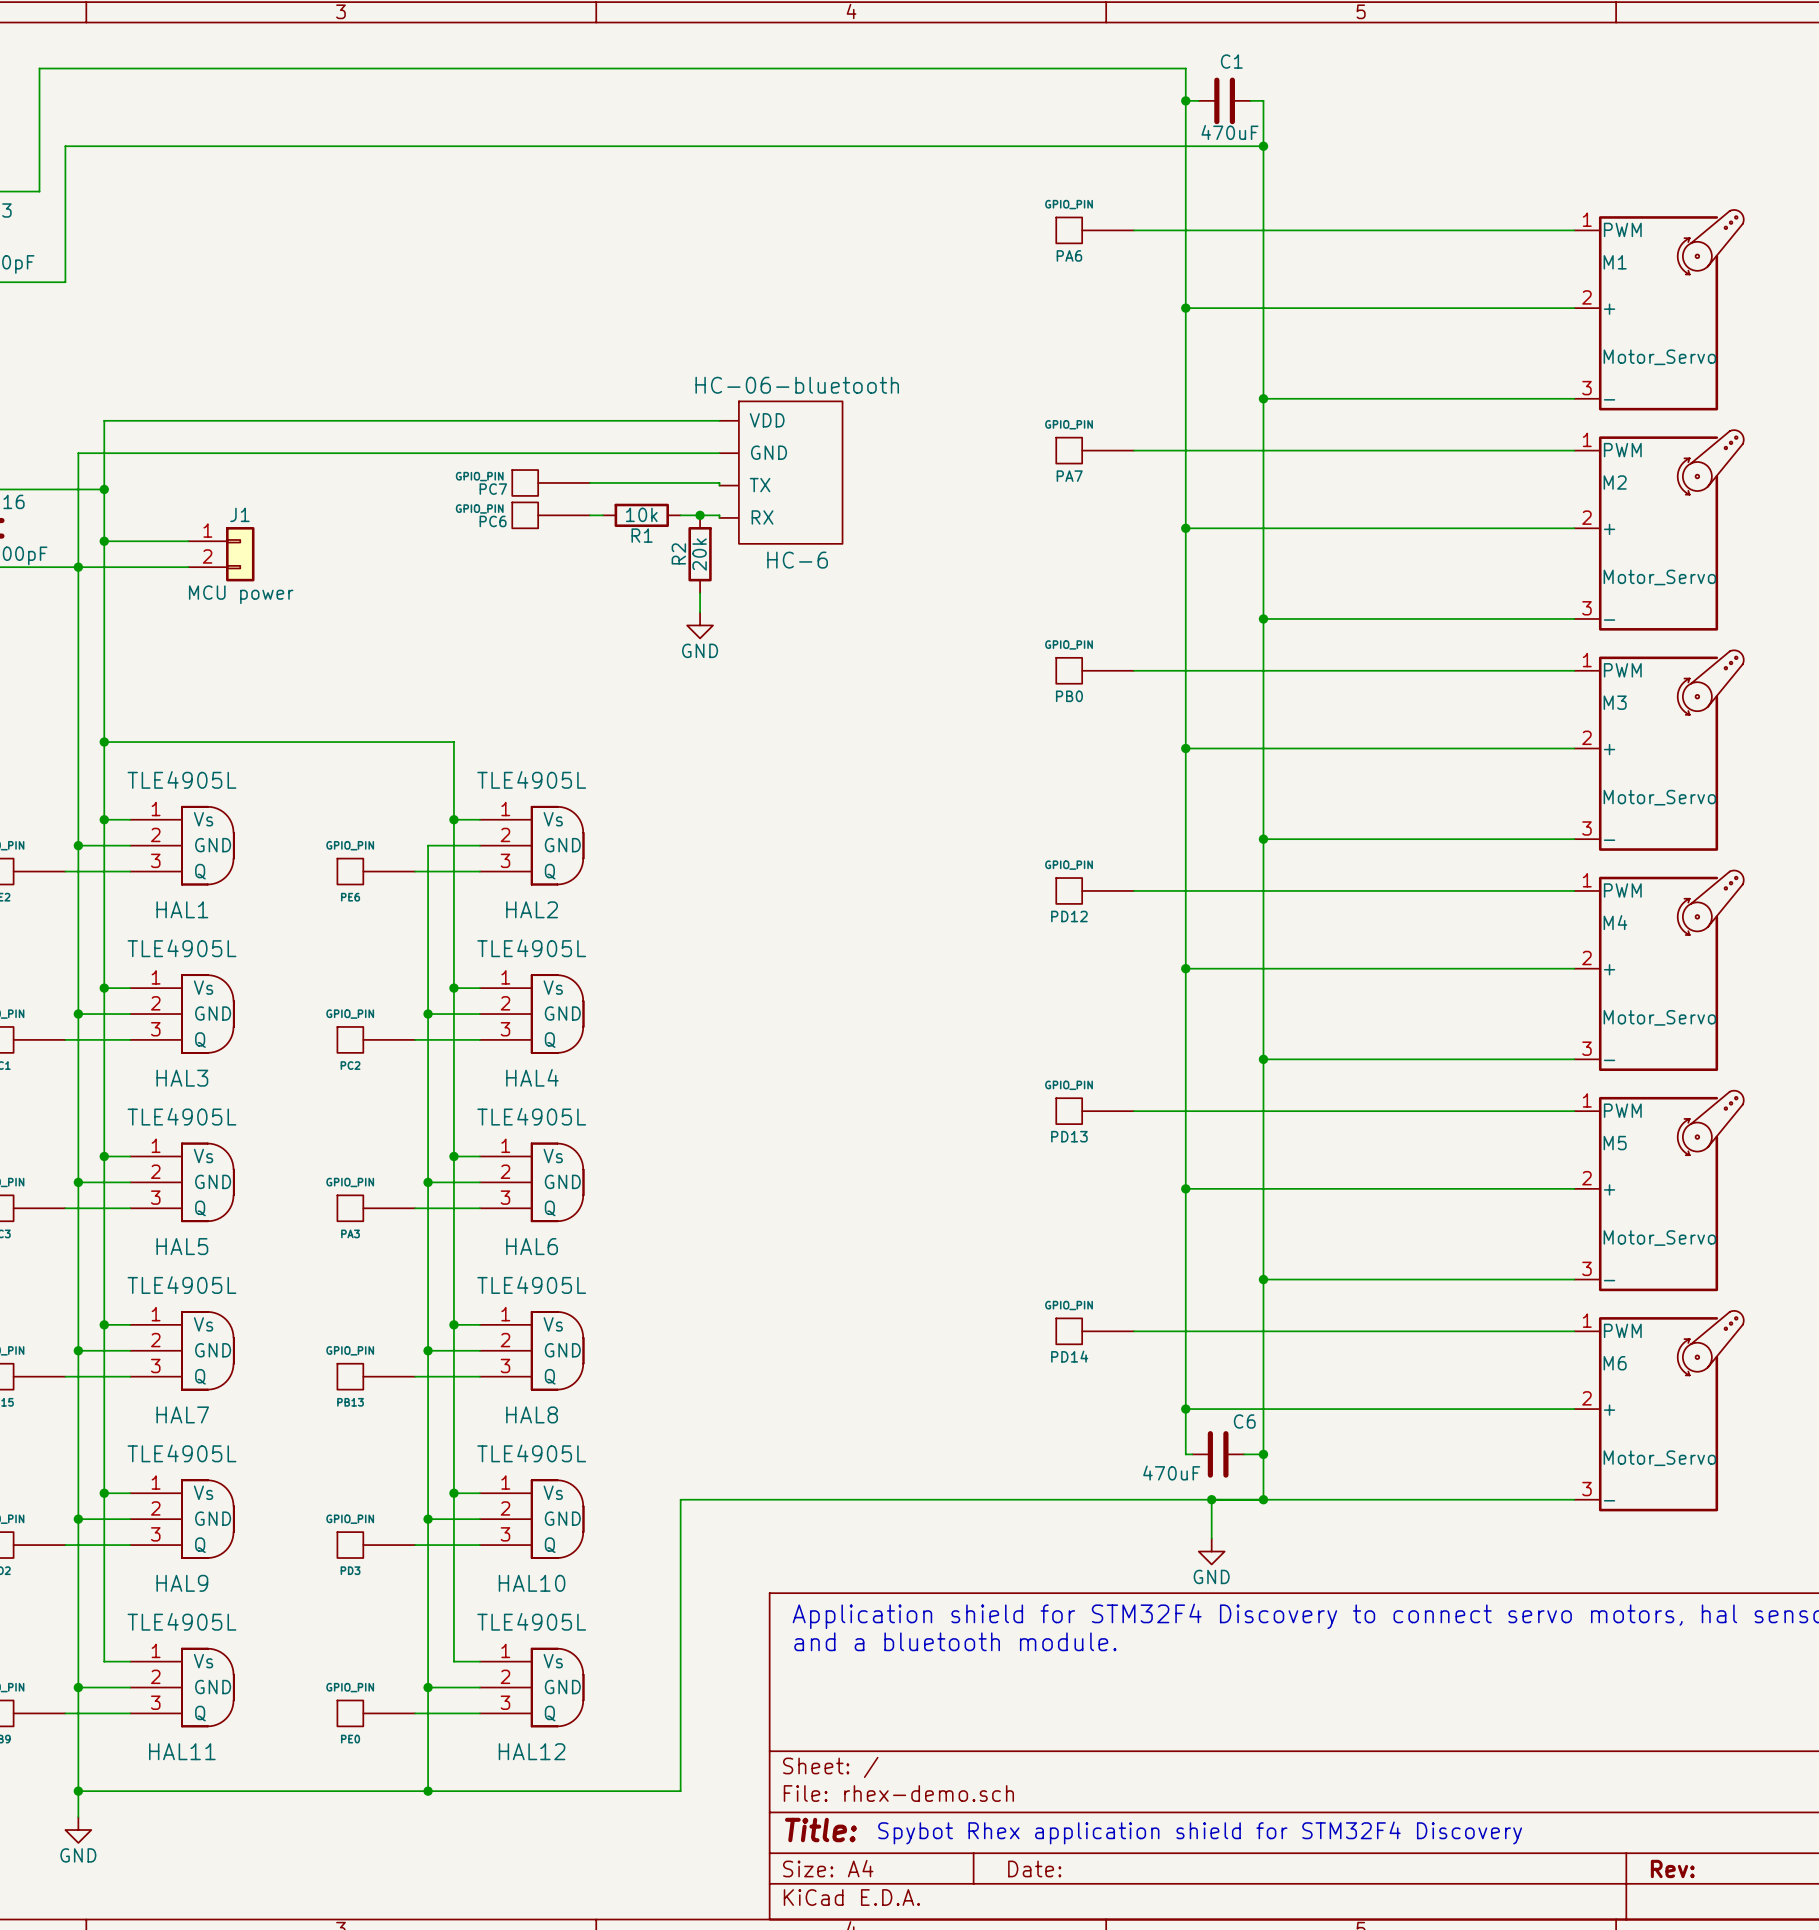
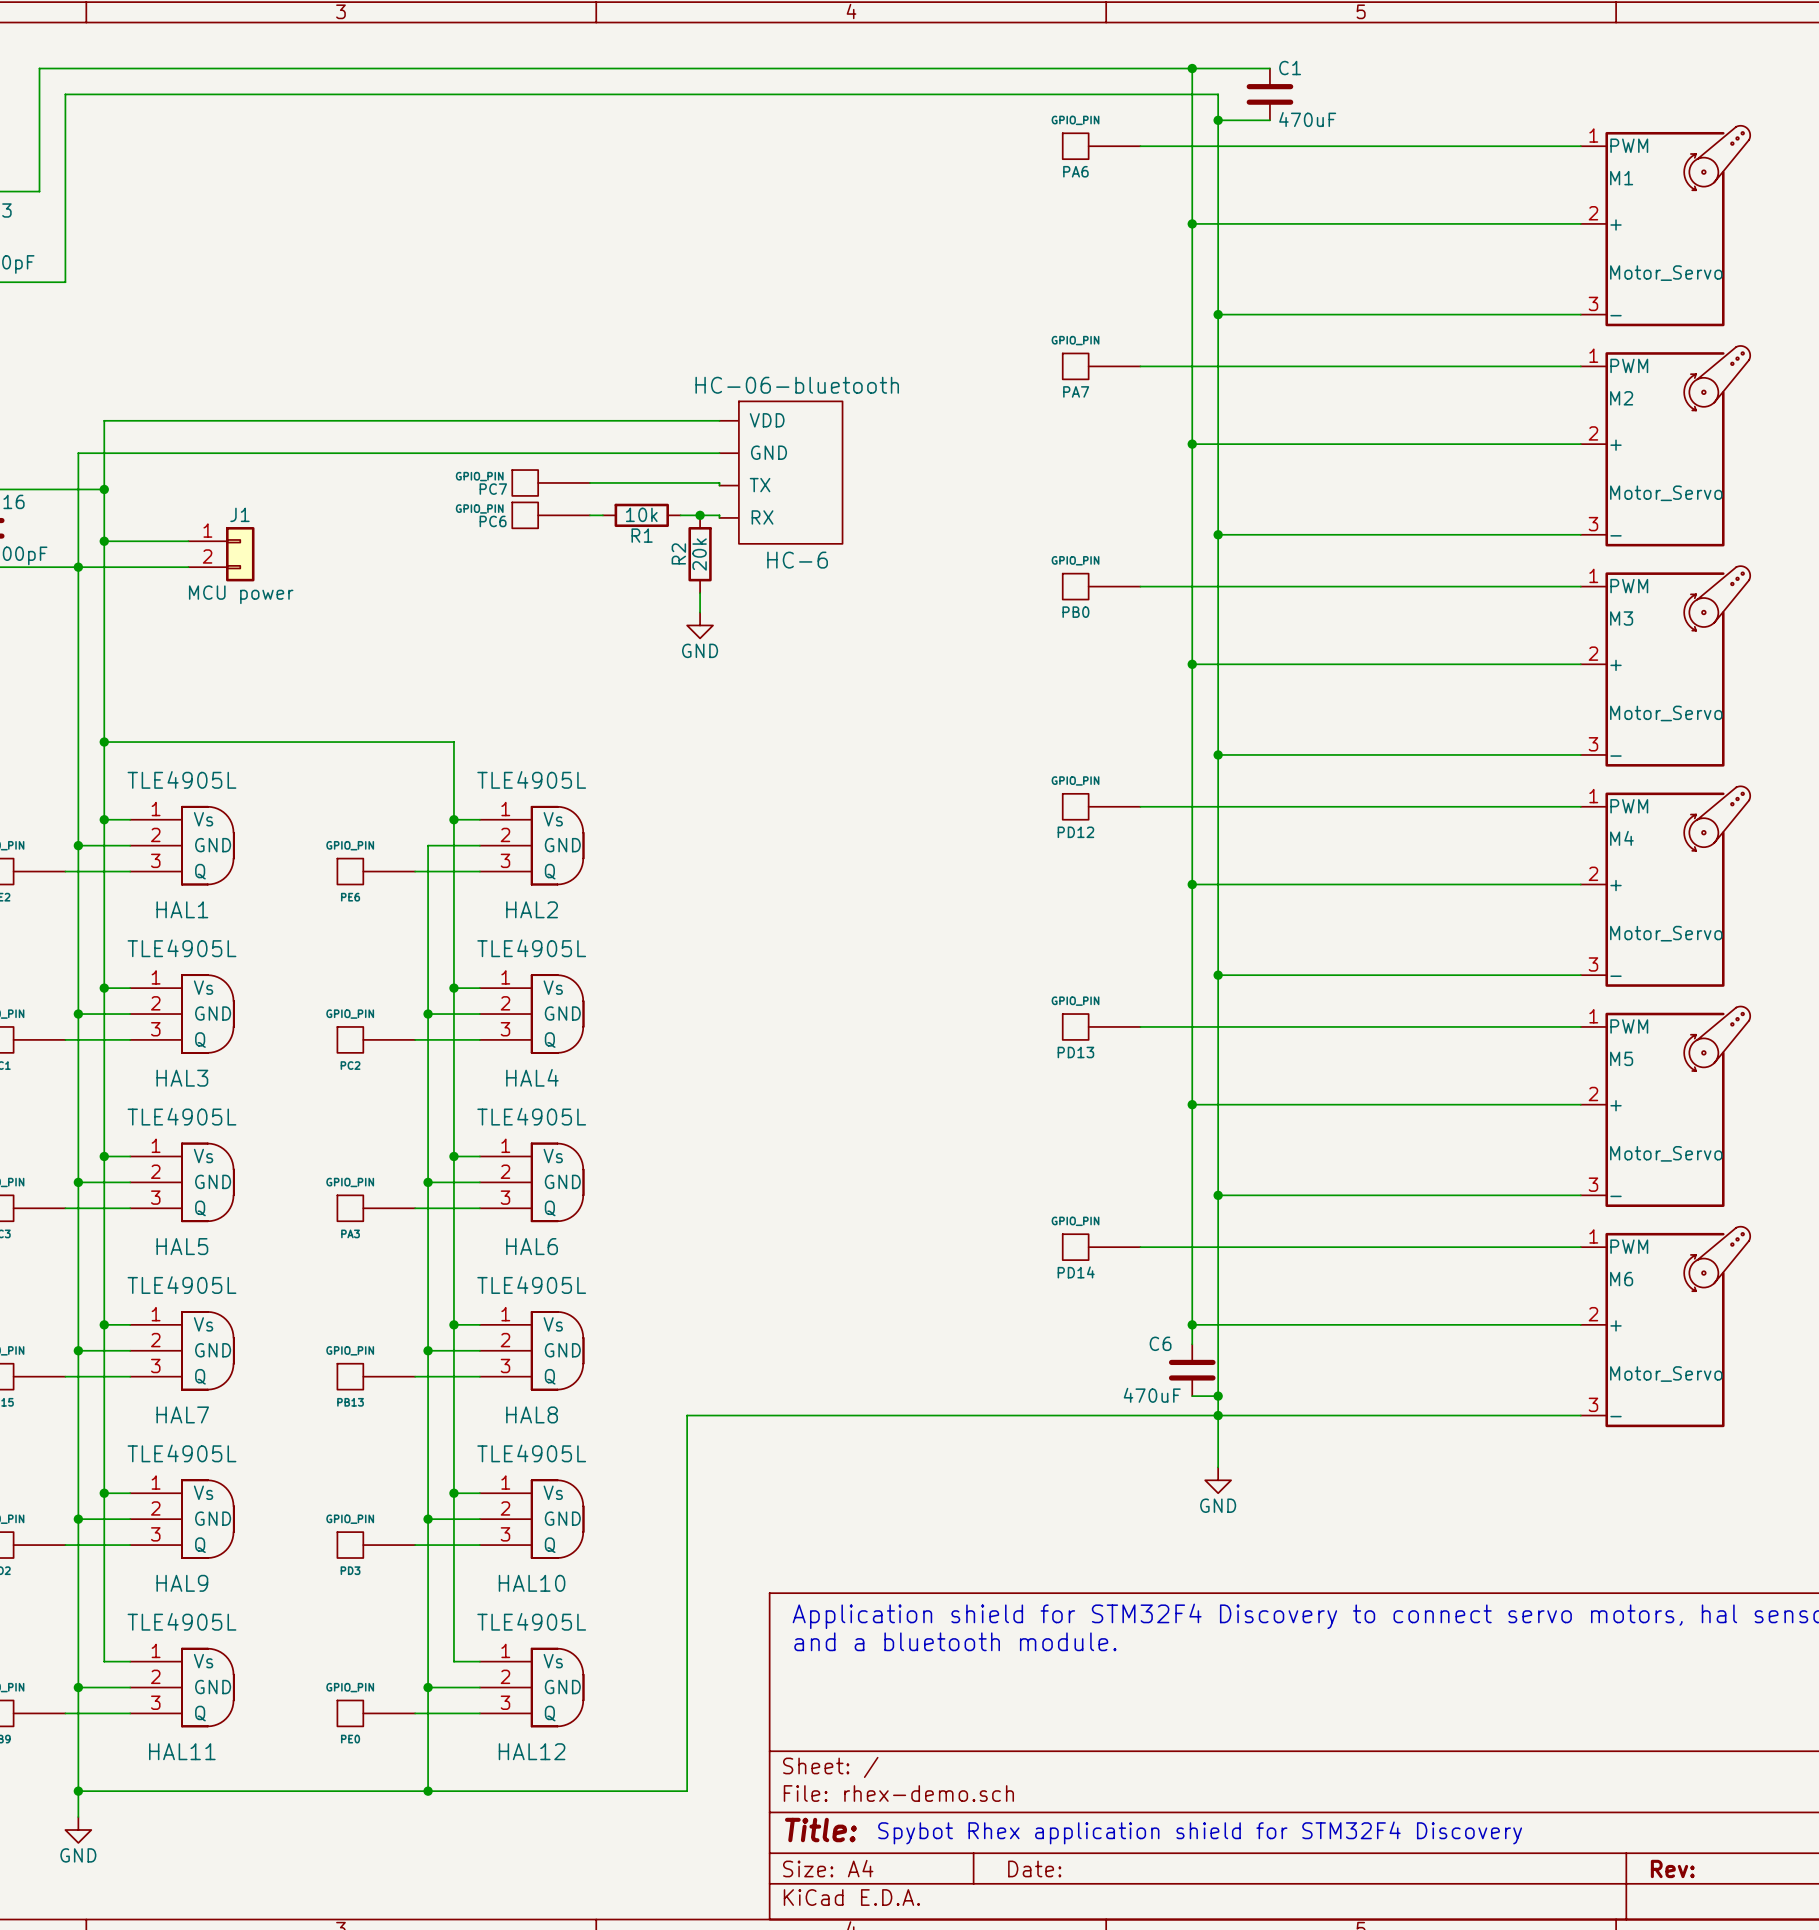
wire: (1185, 68) (1185, 1454) (1192, 1454) -> (1185, 68) (1269, 68)
wire: none -> (1192, 68) (1192, 1344)
junction: none -> (1192, 68)
wire: (1185, 100) (1198, 100) -> none
junction: (1185, 100) -> none
C1 rotation: 0° (1224, 100) -> 90° clockwise (1269, 94)
C1 position: (1224, 100) -> (1269, 94)
wire: (1250, 100) (1263, 100) (1263, 1499) -> none
wire: none -> (1218, 120) (1269, 120)
junction: none -> (1218, 120)
C1 value position: 470uF (1229, 132) -> 470uF (1307, 119)
wire: (65, 146) (1140, 146) -> (65, 146) (65, 94) (1218, 94) (1218, 1467)
wire: none -> (1263, 146) (1580, 146)
junction: (1263, 146) -> none
junction: none -> (1192, 223)
PA6 position: (1095, 230) -> (1101, 146)
wire: (1133, 230) (1574, 230) -> none
wire: (1185, 308) (1574, 308) -> (1192, 223) (1580, 223)
junction position: (1185, 308) -> (1218, 314)
M1 position: (1659, 310) -> (1665, 226)
wire: none -> (1218, 314) (1580, 314)
wire: (1263, 398) (1574, 398) -> none
junction: (1263, 398) -> none
junction: none -> (1192, 444)
PA7 position: (1095, 450) -> (1101, 366)
wire: (1133, 450) (1574, 450) -> (1140, 366) (1580, 366)
wire: (1185, 528) (1574, 528) -> (1192, 444) (1580, 444)
junction position: (1185, 528) -> (1218, 534)
M2 position: (1659, 530) -> (1665, 446)
wire: none -> (1218, 534) (1580, 534)
wire: (1263, 618) (1574, 618) -> none
junction: (1263, 618) -> none
junction: none -> (1192, 664)
PB0 position: (1095, 670) -> (1101, 586)
wire: (1133, 670) (1574, 670) -> (1140, 586) (1580, 586)
wire: (1185, 748) (1574, 748) -> (1192, 664) (1580, 664)
junction position: (1185, 748) -> (1218, 754)
M3 position: (1659, 750) -> (1665, 666)
wire: none -> (1218, 754) (1580, 754)
wire: (1263, 839) (1574, 839) -> none
junction: (1263, 839) -> none
junction: none -> (1192, 884)
PD12 position: (1095, 890) -> (1101, 806)
wire: (1133, 890) (1574, 890) -> (1140, 806) (1580, 806)
wire: (1185, 968) (1574, 968) -> (1192, 884) (1580, 884)
junction position: (1185, 968) -> (1218, 975)
M4 position: (1659, 970) -> (1665, 886)
wire: none -> (1218, 975) (1580, 975)
wire: (1263, 1059) (1574, 1059) -> none
junction: (1263, 1059) -> none
junction: none -> (1192, 1104)
PD13 position: (1095, 1111) -> (1101, 1026)
wire: (1133, 1111) (1574, 1111) -> (1140, 1026) (1580, 1026)
wire: (1185, 1188) (1574, 1188) -> (1192, 1104) (1580, 1104)
junction position: (1185, 1188) -> (1218, 1195)
M5 position: (1659, 1190) -> (1665, 1106)
wire: none -> (1218, 1195) (1580, 1195)
wire: (1263, 1279) (1574, 1279) -> none
junction: (1263, 1279) -> none
junction: none -> (1192, 1324)
PD14 position: (1095, 1331) -> (1101, 1247)
wire: (1133, 1331) (1574, 1331) -> (1140, 1247) (1580, 1247)
wire: none -> (1192, 1396) (1218, 1396)
junction: none -> (1218, 1396)
wire: (1185, 1409) (1574, 1409) -> (1192, 1324) (1580, 1324)
junction: (1185, 1409) -> none
M6 position: (1659, 1411) -> (1665, 1326)
junction: none -> (1218, 1415)
C6 name position: C6 (1244, 1421) -> C6 (1160, 1343)
C6 rotation: 0° (1218, 1454) -> 90° clockwise (1192, 1370)
C6 position: (1218, 1454) -> (1192, 1370)
wire: (1244, 1454) (1263, 1454) -> none
junction: (1263, 1454) -> none
wire: (1211, 1499) (1211, 1538) -> none
junction: (1211, 1499) -> none
junction: (1263, 1499) -> none
wire: (1574, 1499) (680, 1499) (680, 1791) -> (1580, 1415) (687, 1415) (687, 1791) (680, 1791)
power symbol position: GND (1211, 1551) -> GND (1218, 1480)

